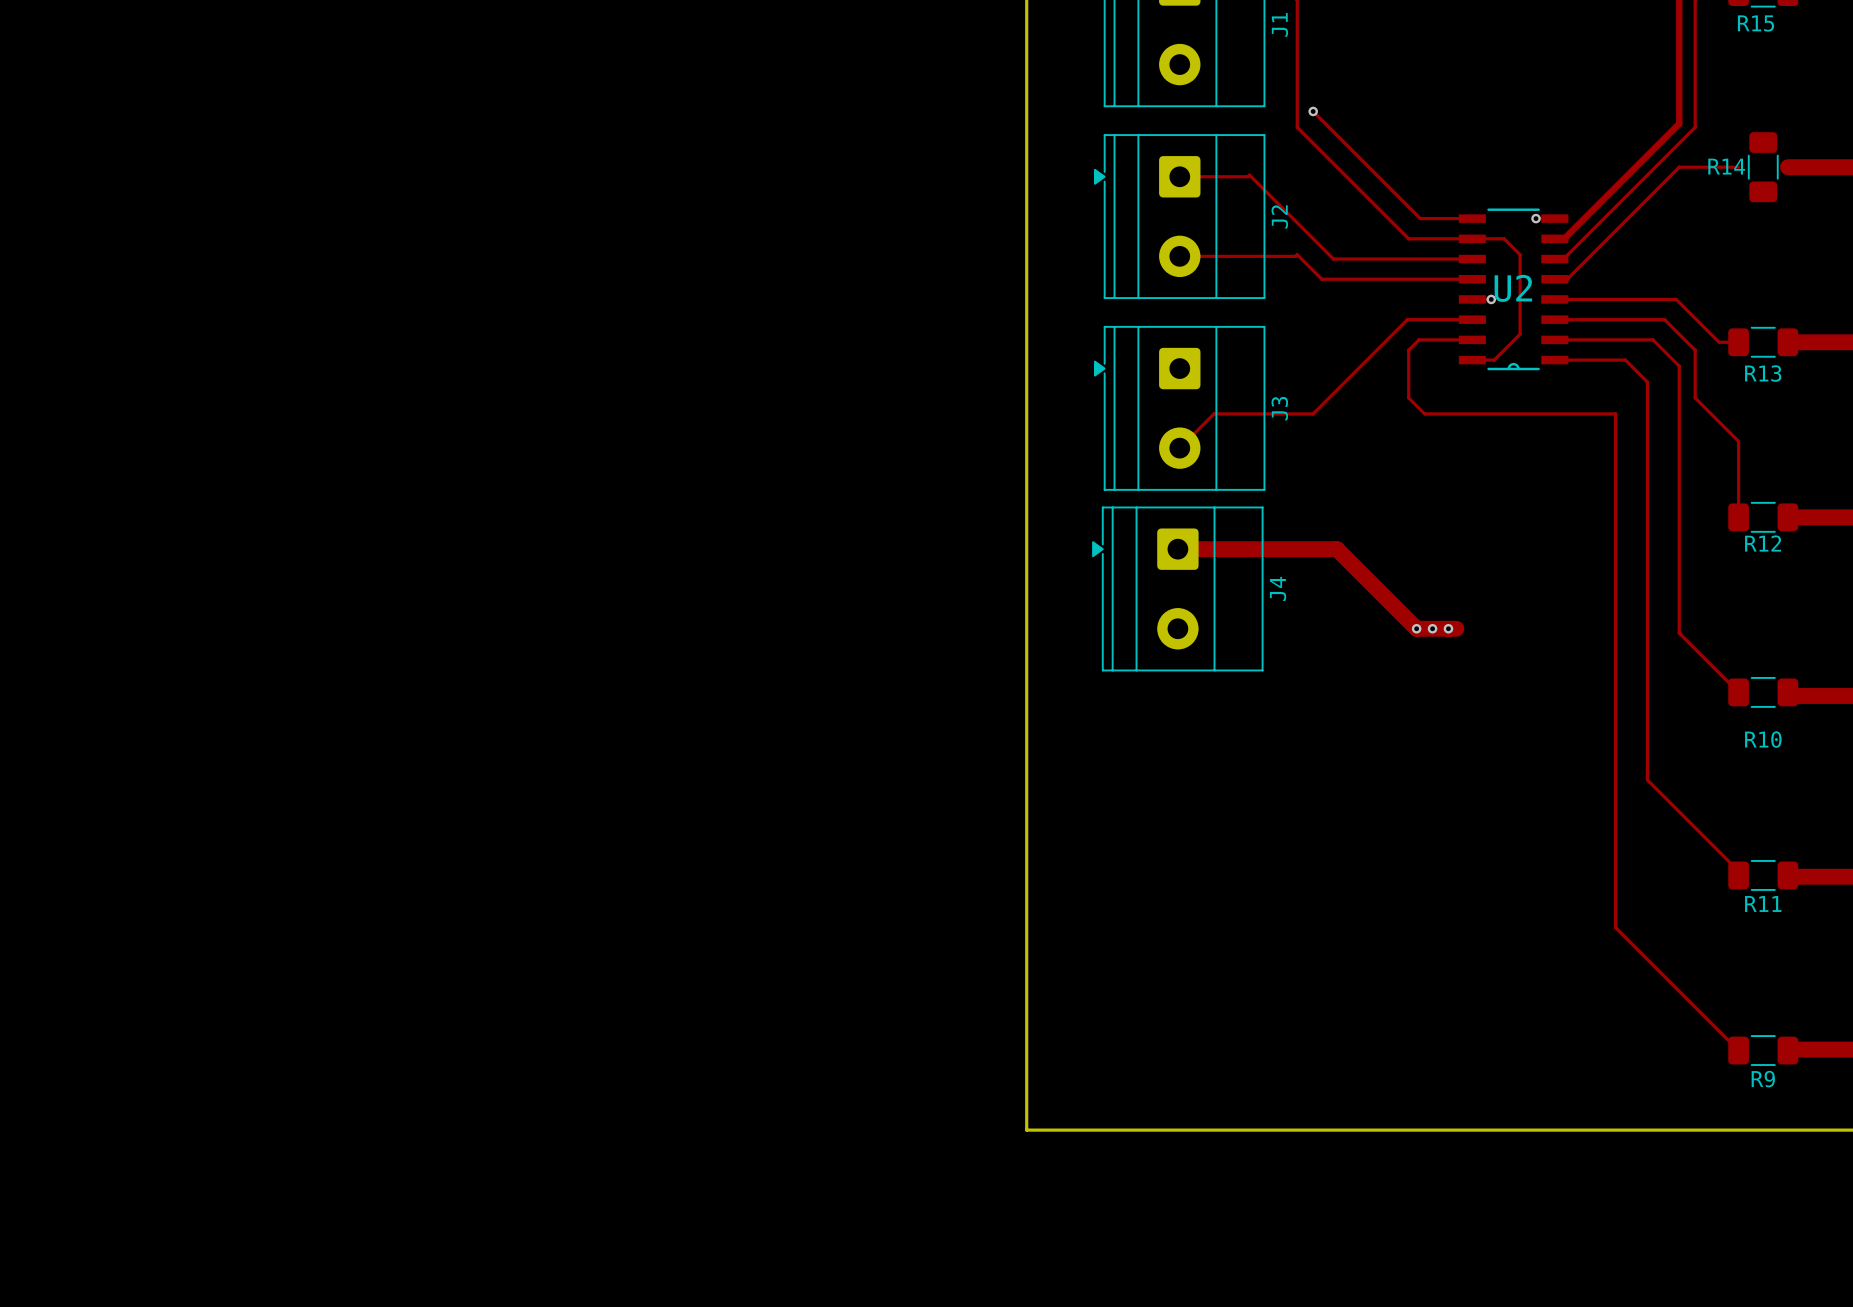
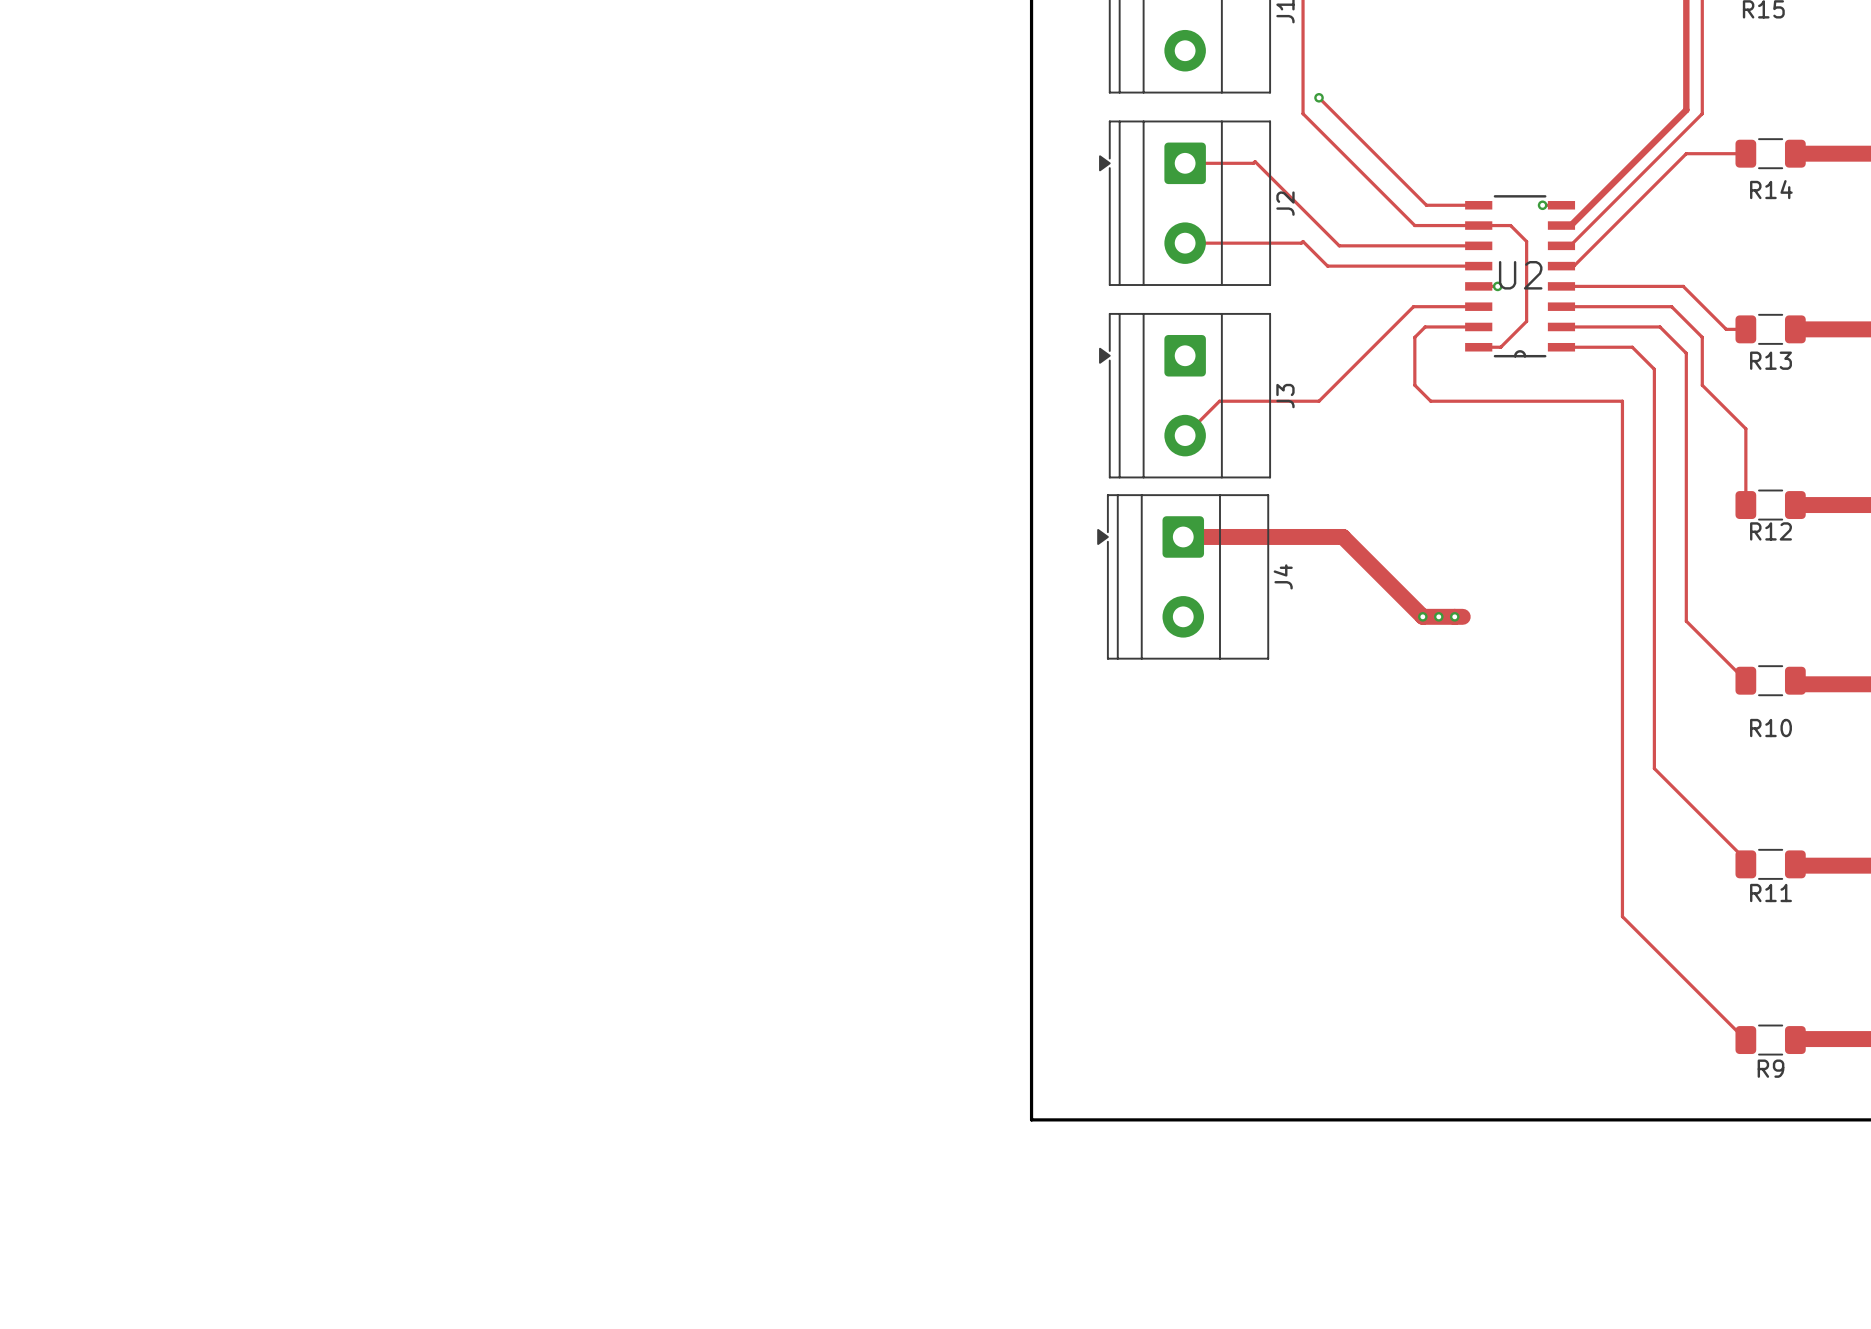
R14 name position: R14 (1726, 166) -> R14 (1771, 189)
R14 rotation: 0° (1763, 167) -> 90° clockwise (1770, 153)

